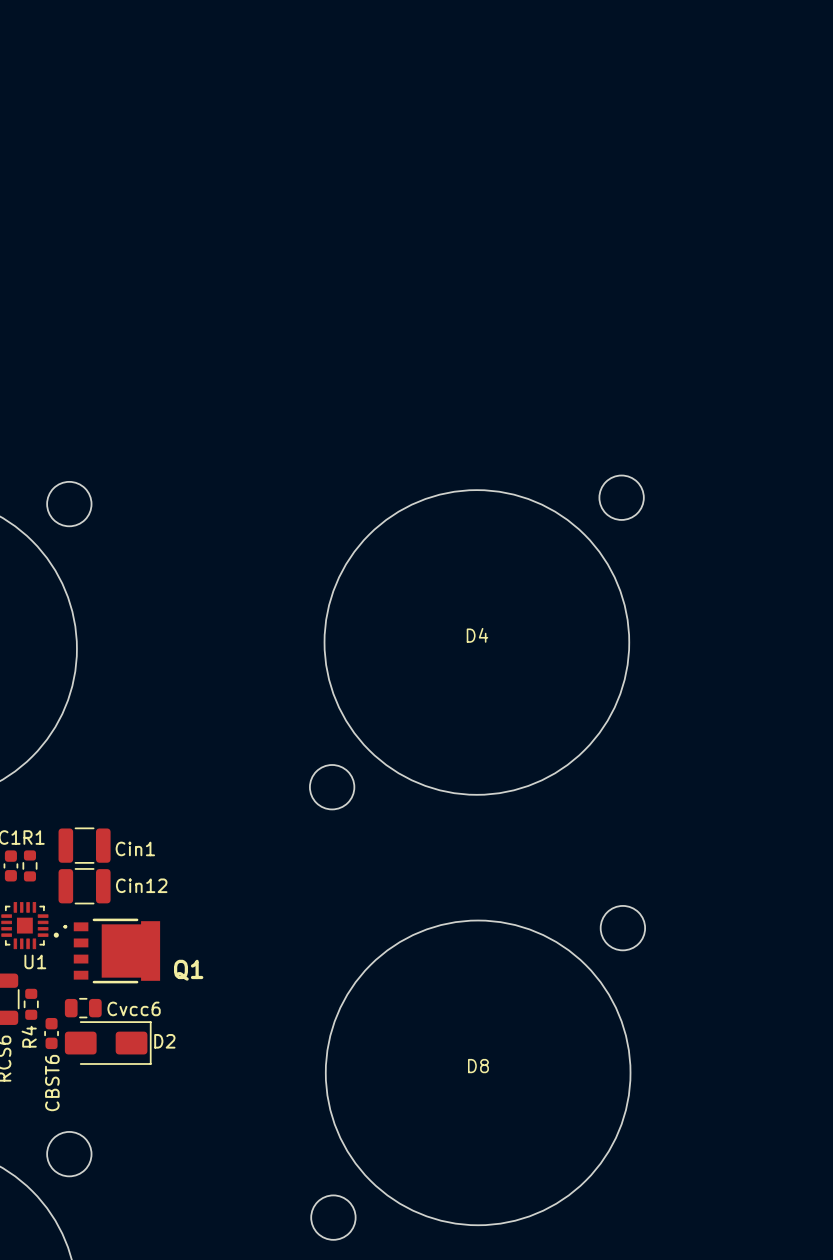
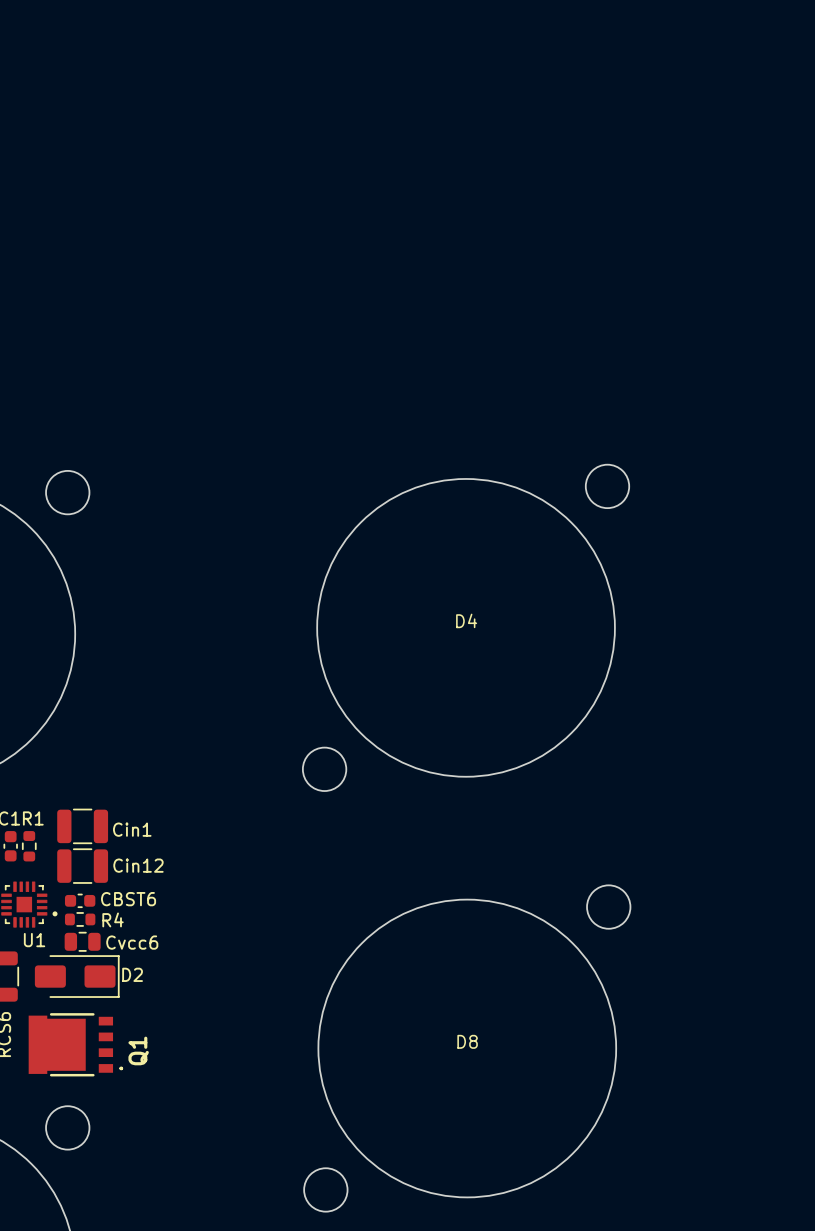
Q1 rotation: 0° (111, 950) -> 180° (75, 1044)
Q1 position: (111, 950) -> (75, 1044)
R4 rotation: 0° (31, 1004) -> 90° clockwise (80, 919)
R4 position: (31, 1004) -> (80, 919)
Cvcc6 position: (83, 1008) -> (82, 941)
CBST6 rotation: 0° (51, 1033) -> 90° clockwise (80, 900)
CBST6 position: (51, 1033) -> (80, 900)
R4 name position: R4 (29, 1036) -> R4 (113, 919)
D2 position: (108, 1043) -> (77, 976)
CBST6 name position: CBST6 (52, 1083) -> CBST6 (128, 899)

